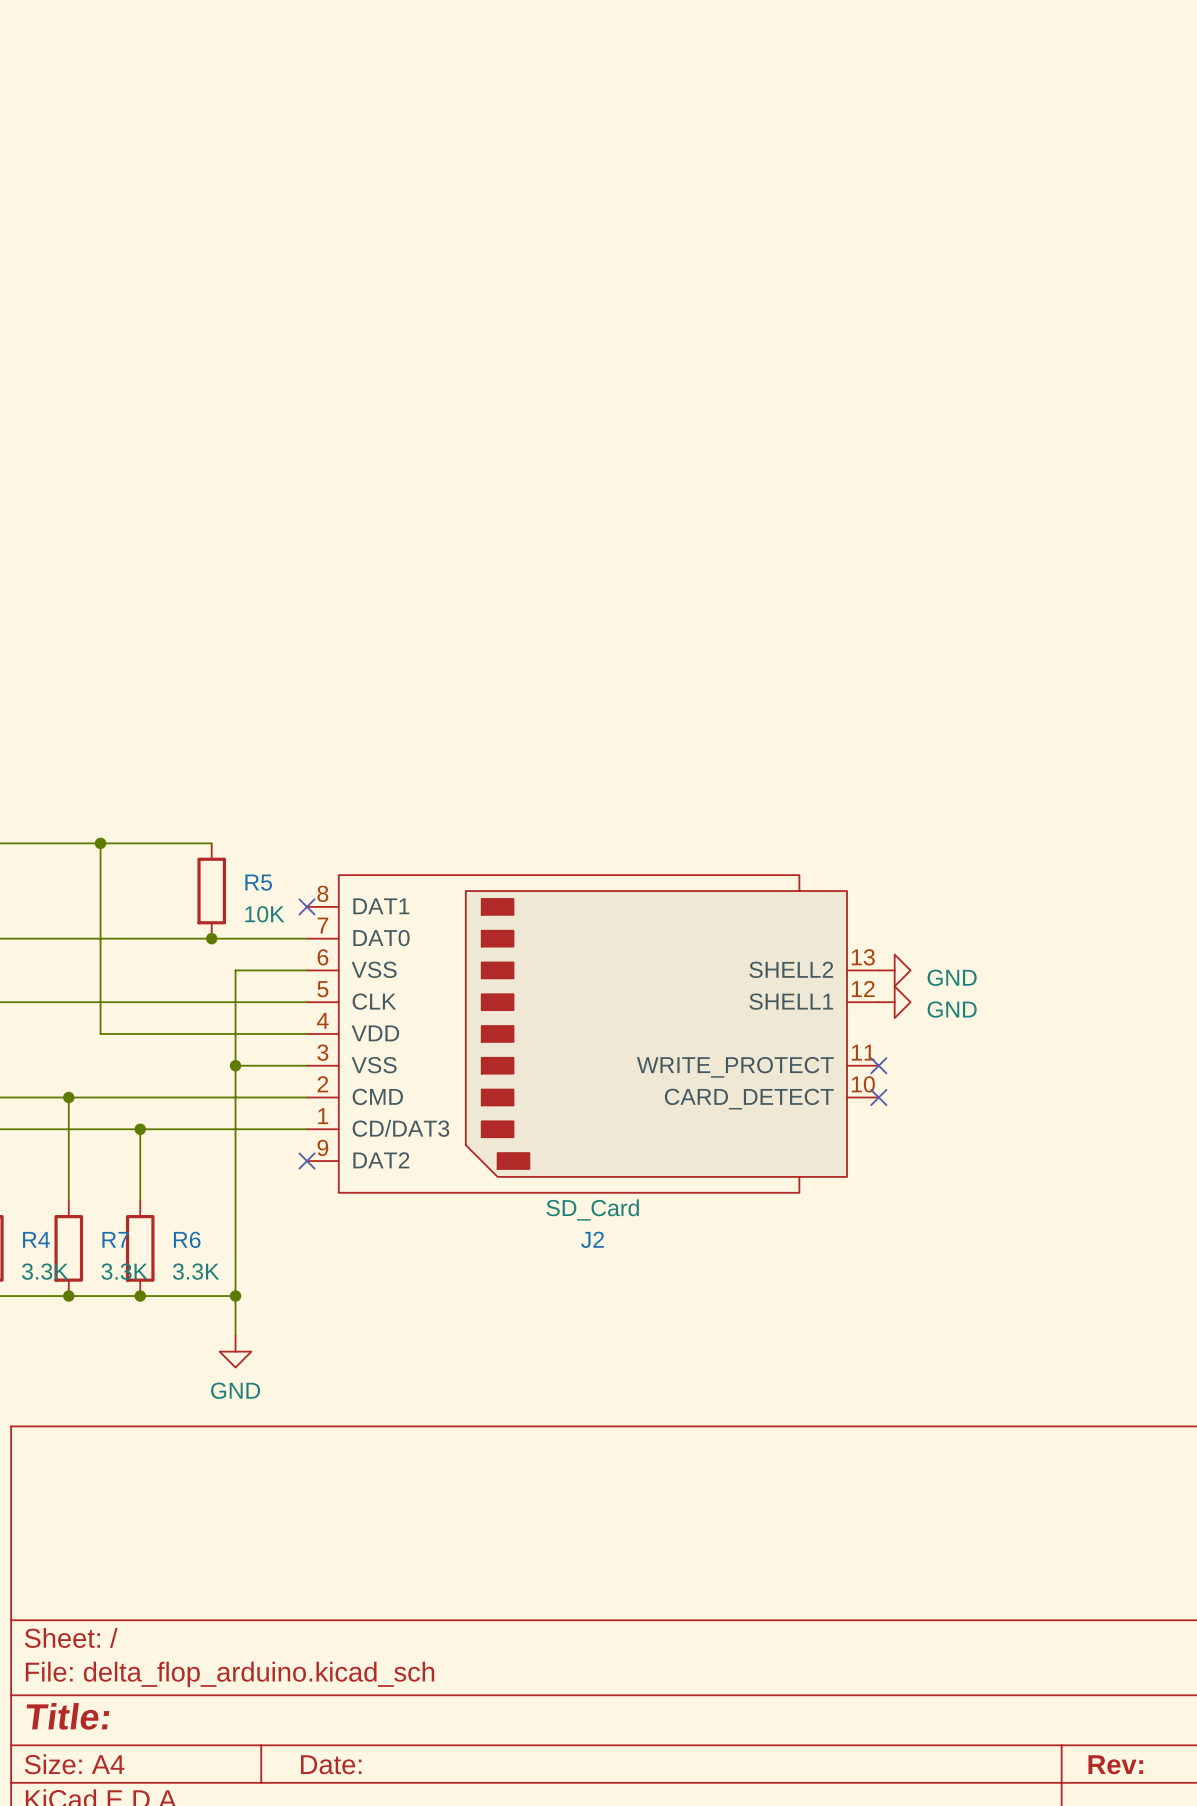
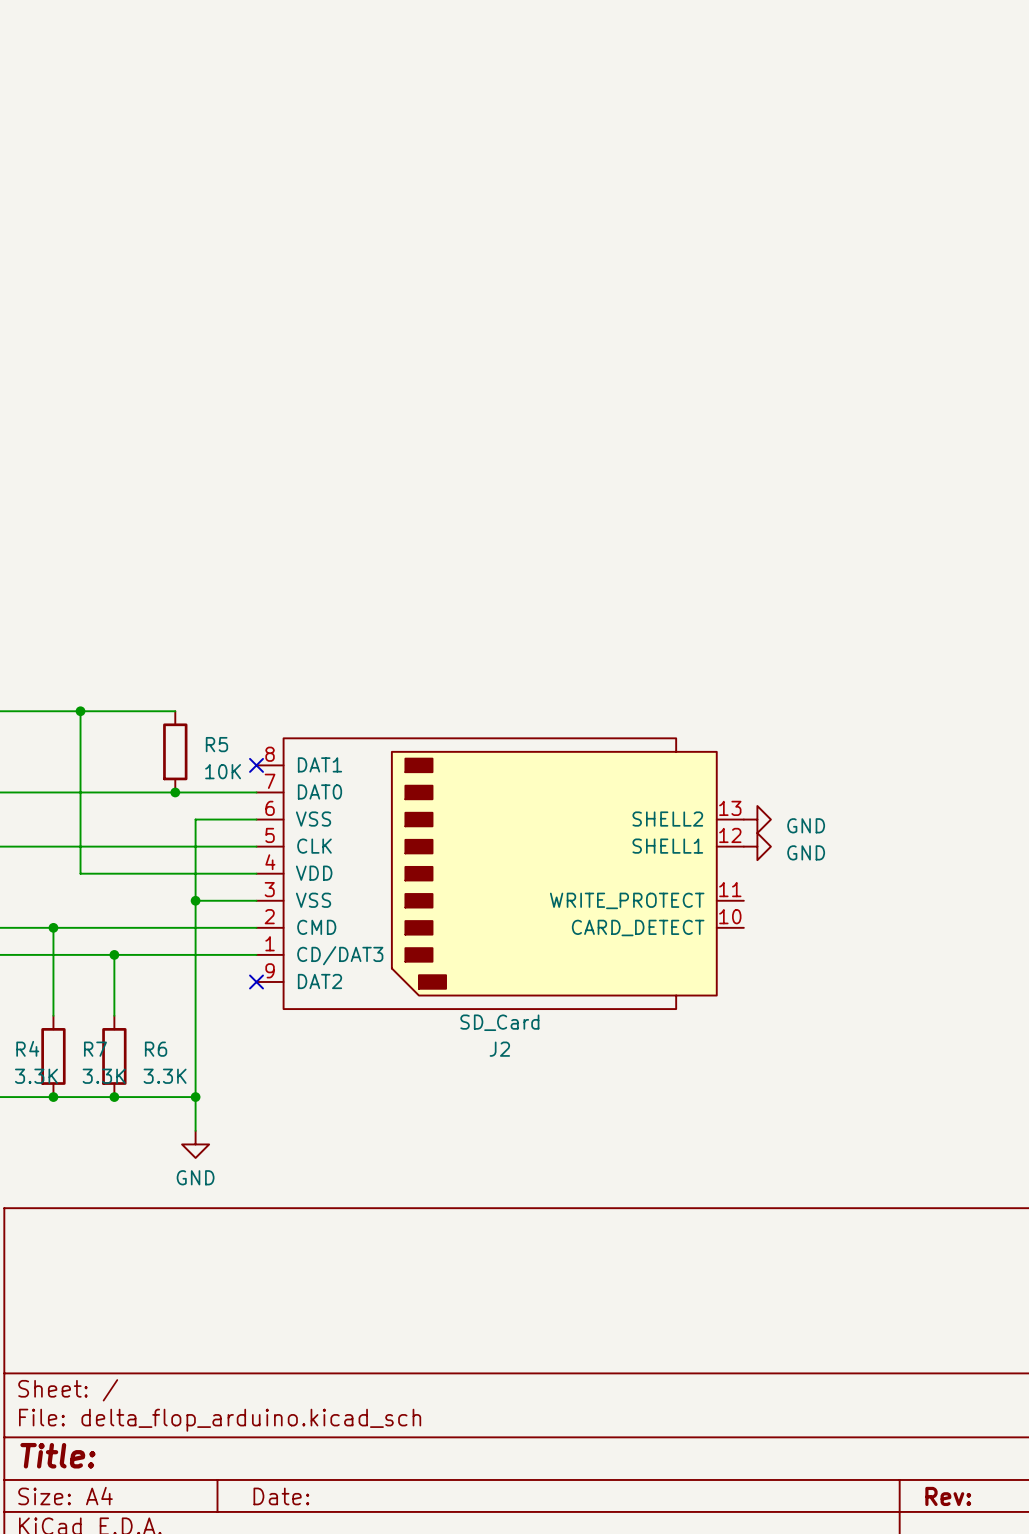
no-connect mark: (878, 1065) -> none
no-connect mark: (878, 1097) -> none

